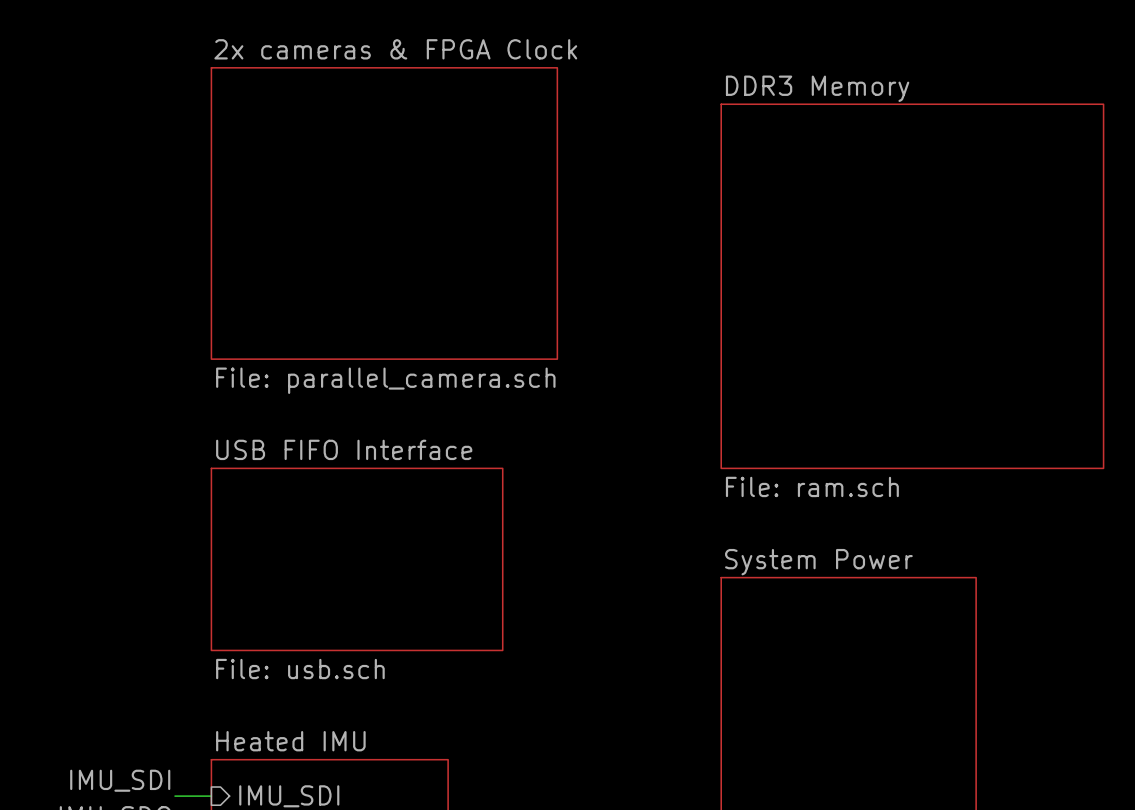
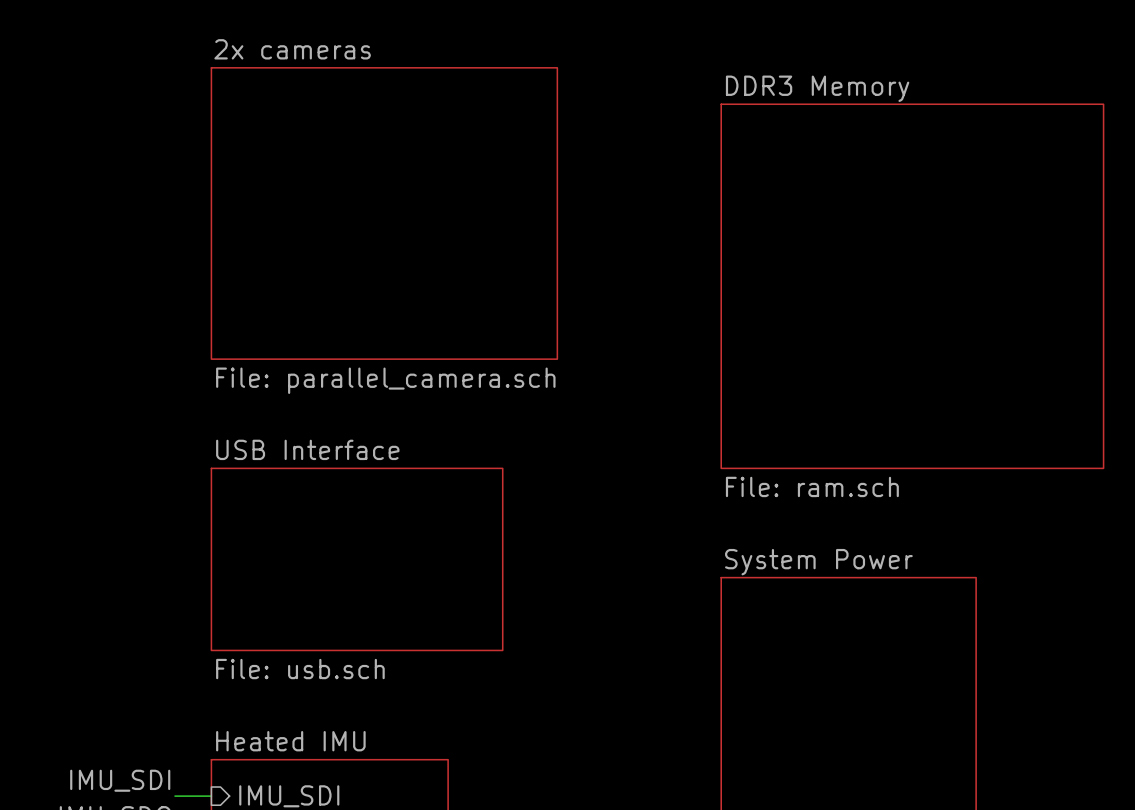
sheet 2x cameras & FPGA Clock name: 2x cameras & FPGA Clock (395, 49) -> 2x cameras (292, 49)
sheet USB FIFO Interface name: USB FIFO Interface (344, 449) -> USB Interface (307, 449)

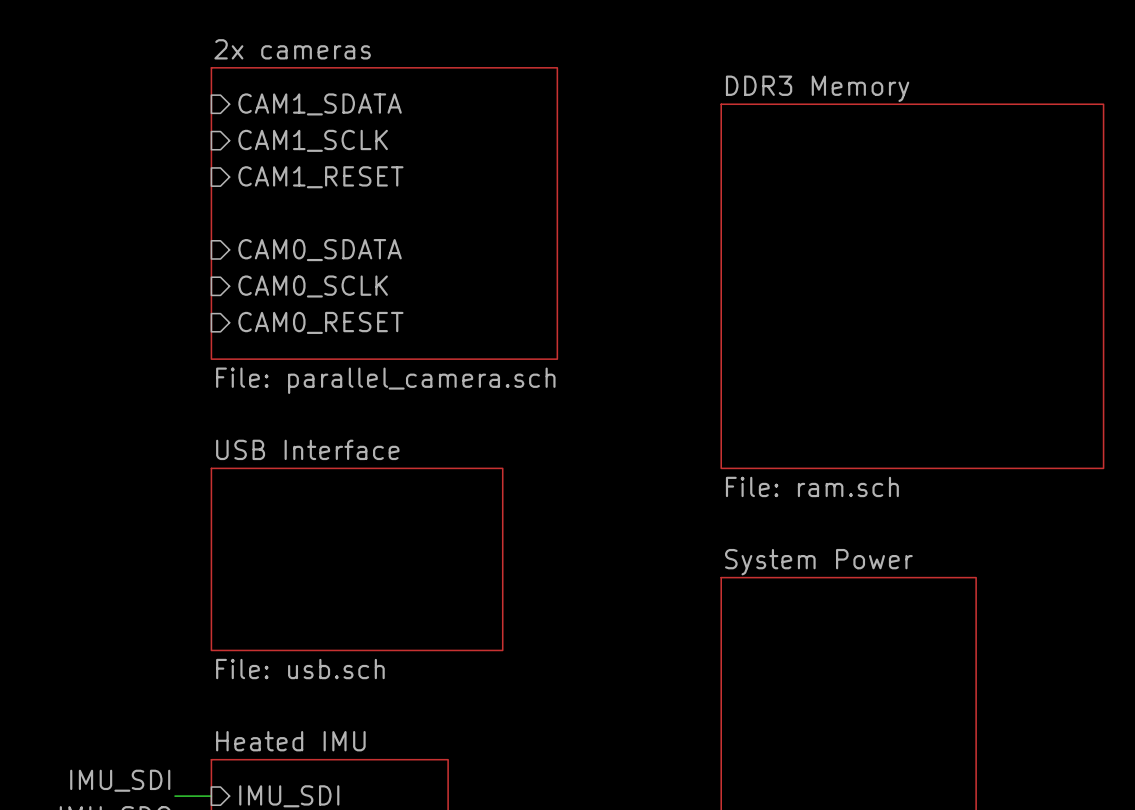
sheet pin: none -> CAM1_SDATA (320, 104)
sheet pin: none -> CAM1_SCLK (313, 140)
sheet pin: none -> CAM1_RESET (320, 177)
sheet pin: none -> CAM0_SDATA (320, 250)
sheet pin: none -> CAM0_SCLK (313, 286)
sheet pin: none -> CAM0_RESET (320, 322)

